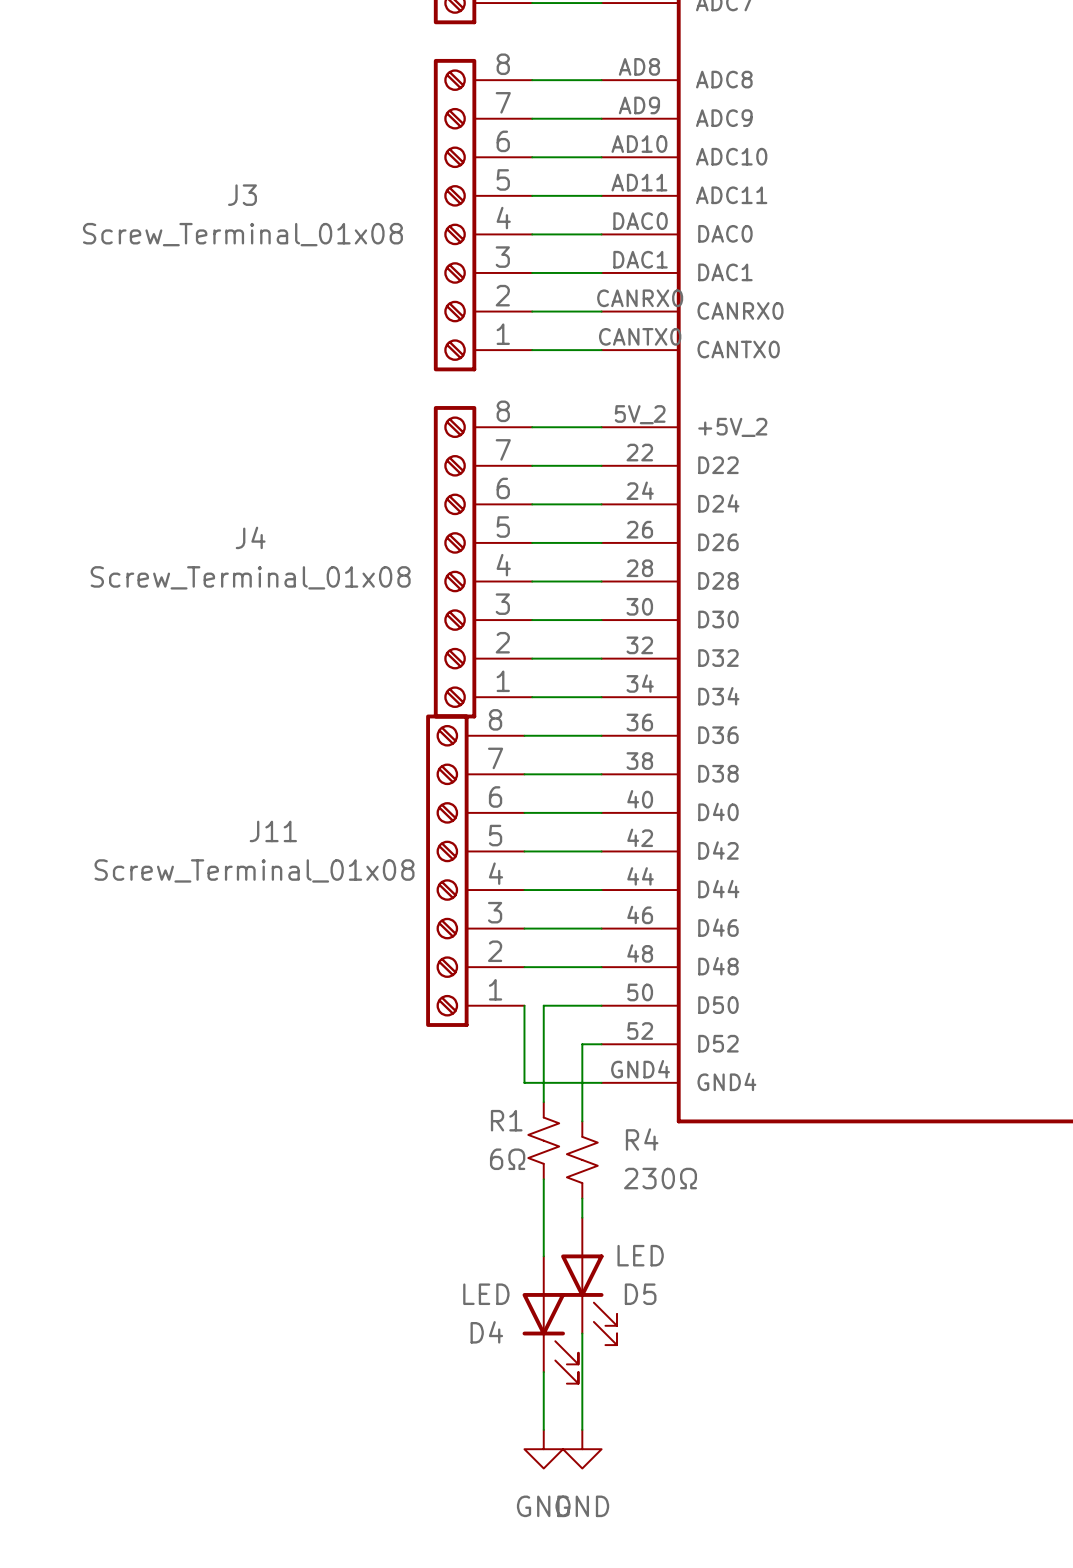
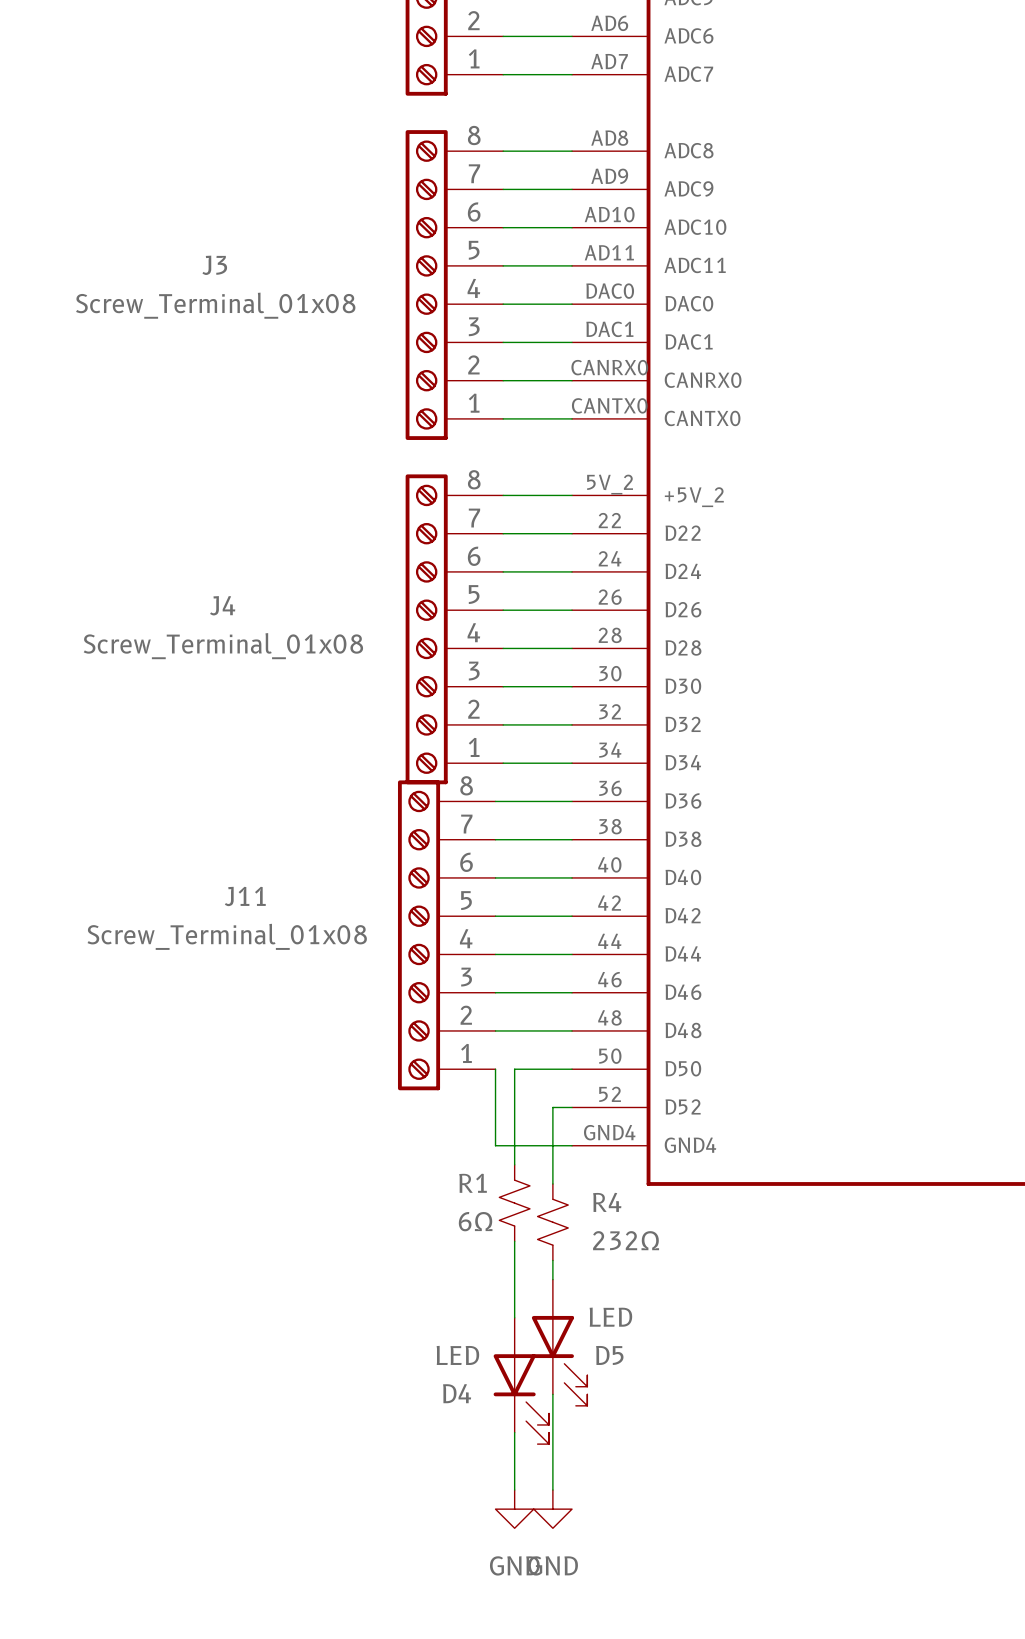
R4 value: 230Ω (660, 1178) -> 232Ω (626, 1240)

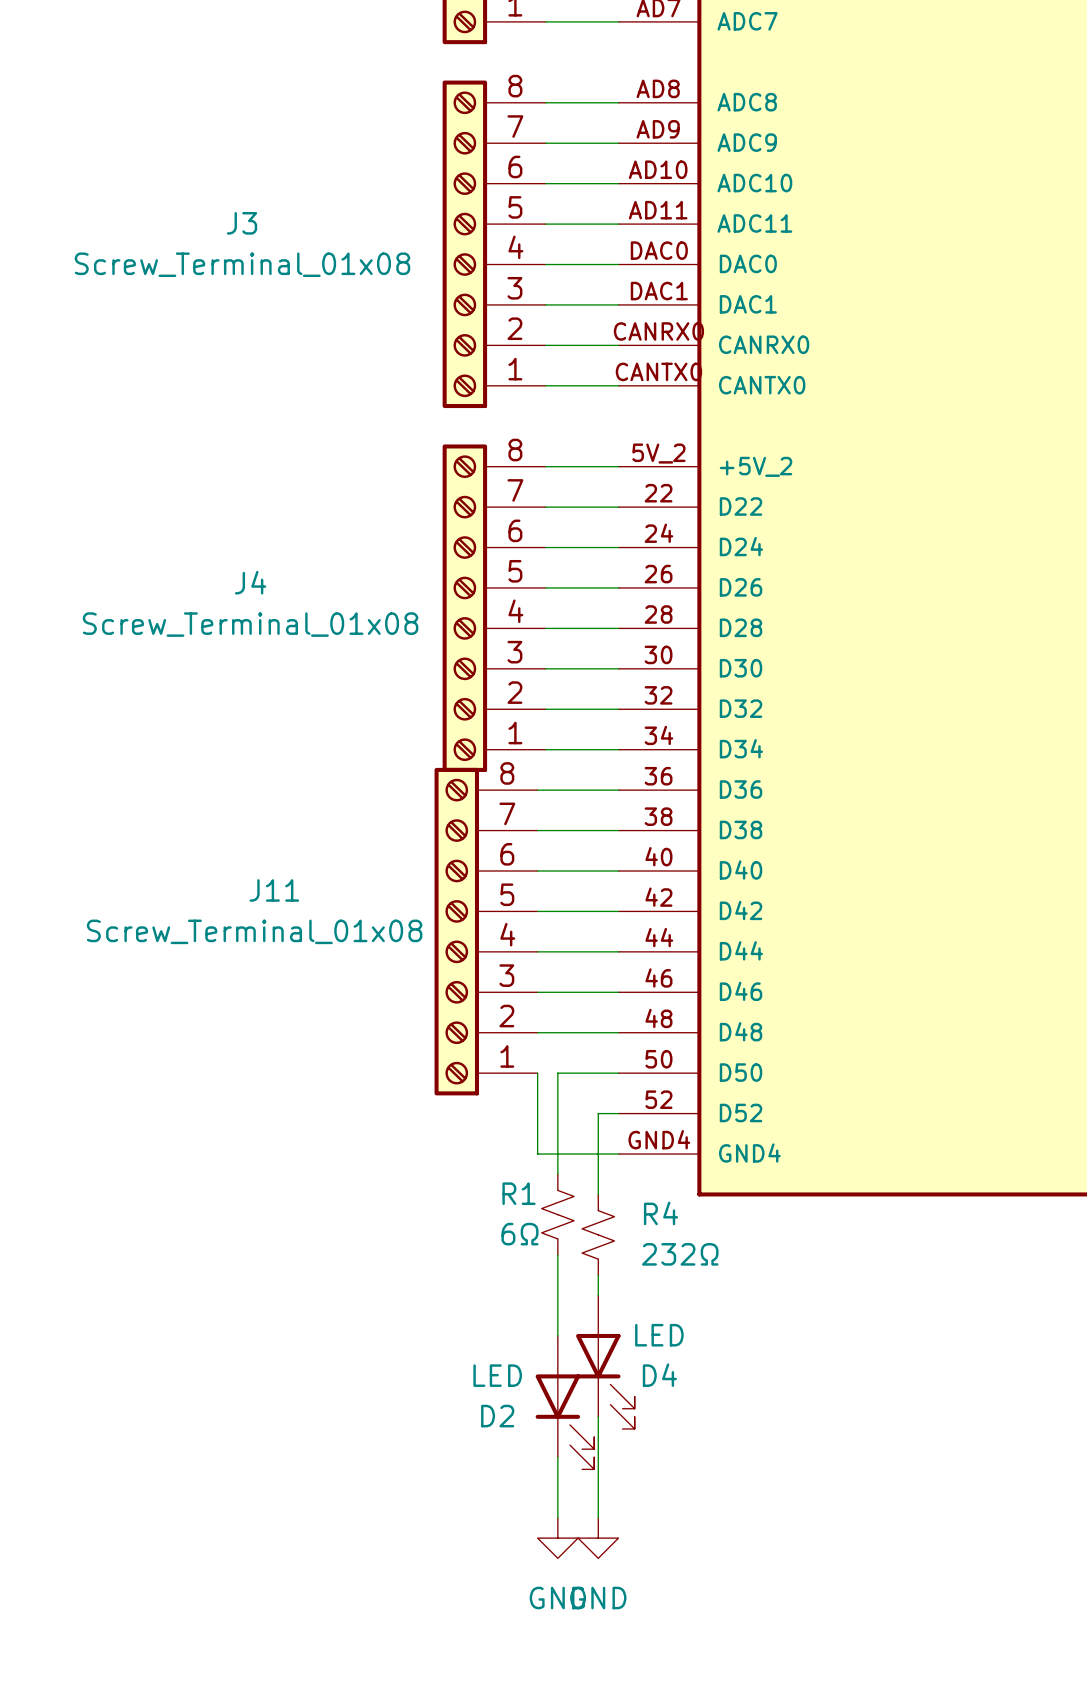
D5 name: D5 (609, 1355) -> D4 (659, 1375)
D4 name: D4 (457, 1393) -> D2 (497, 1416)

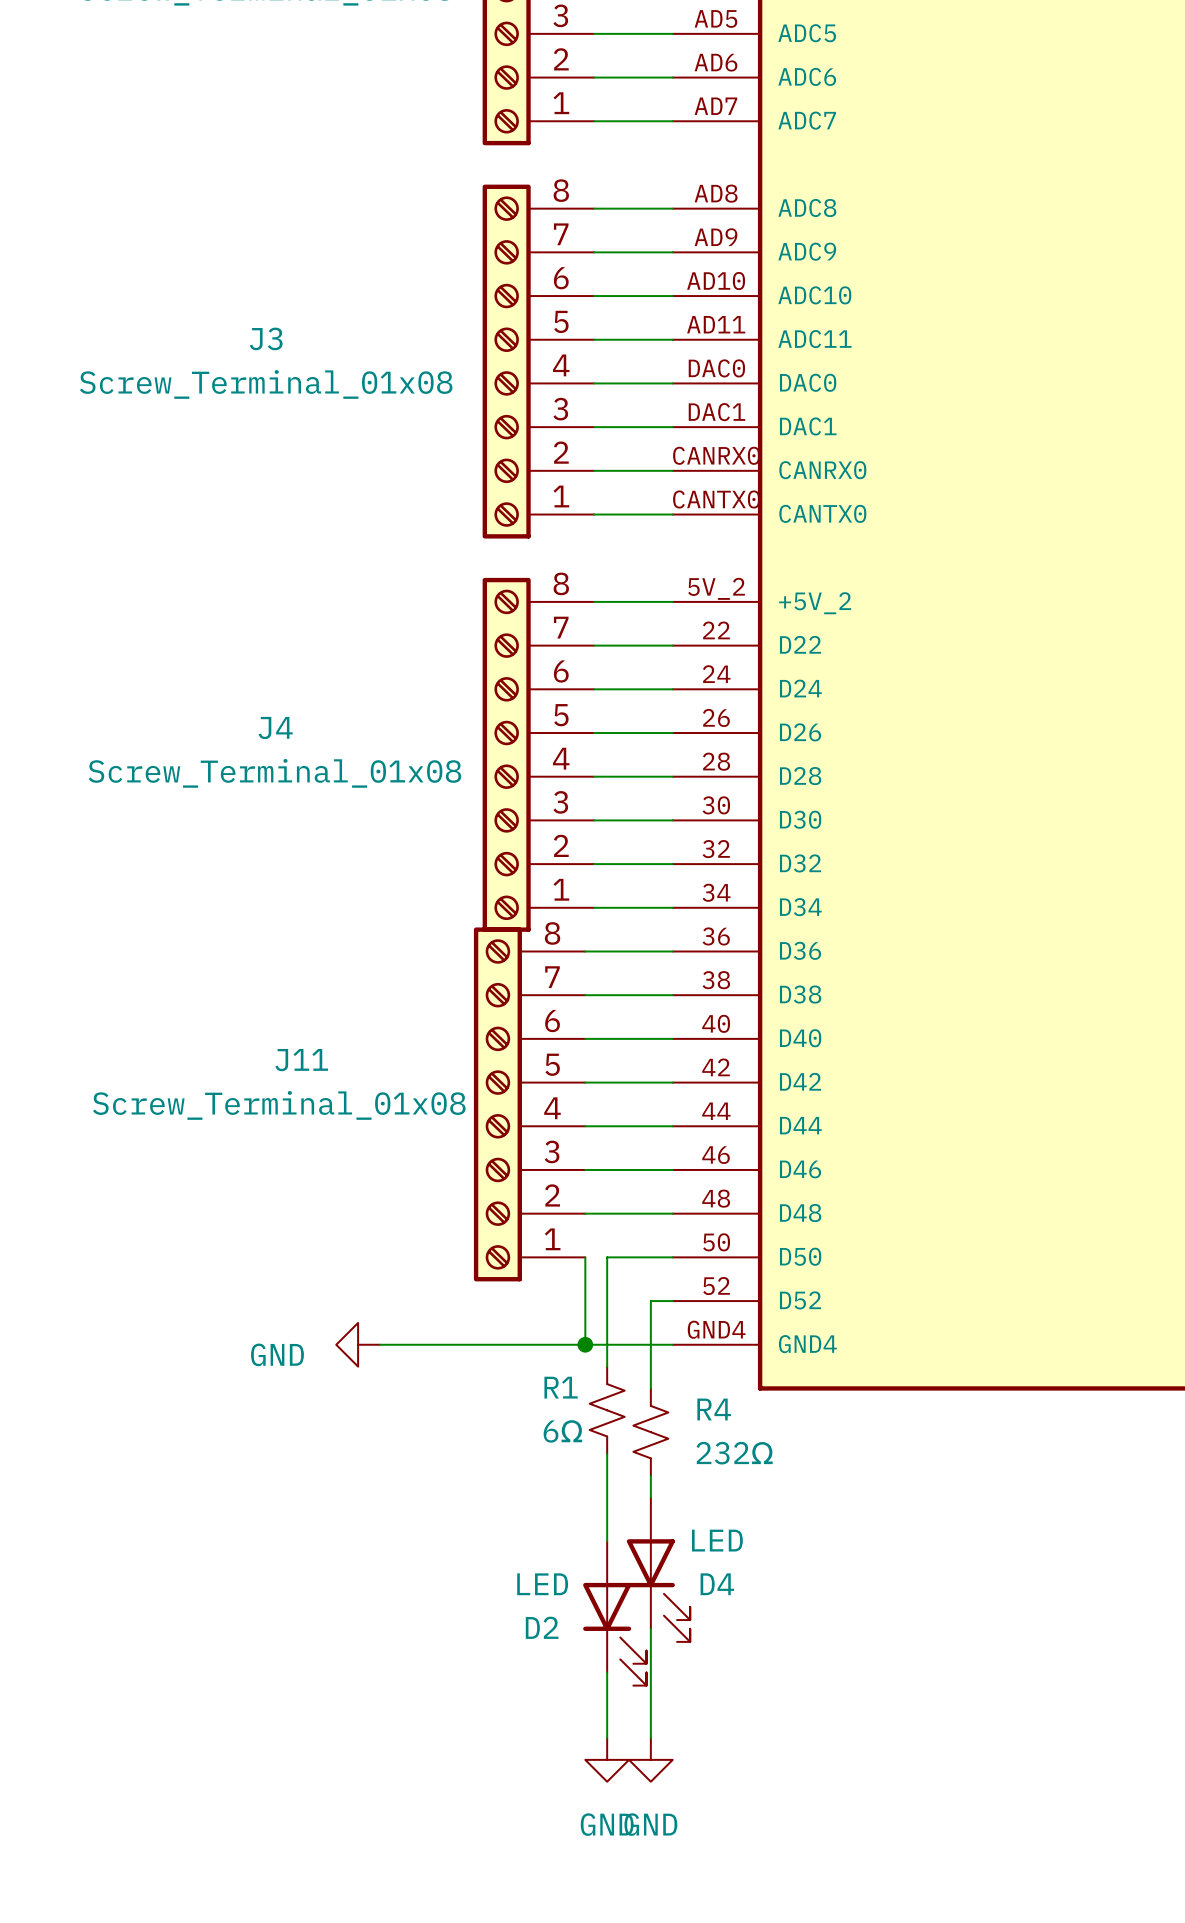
power symbol: none -> GND (358, 1344)
wire: none -> (379, 1344) (585, 1344)
junction: none -> (585, 1344)

